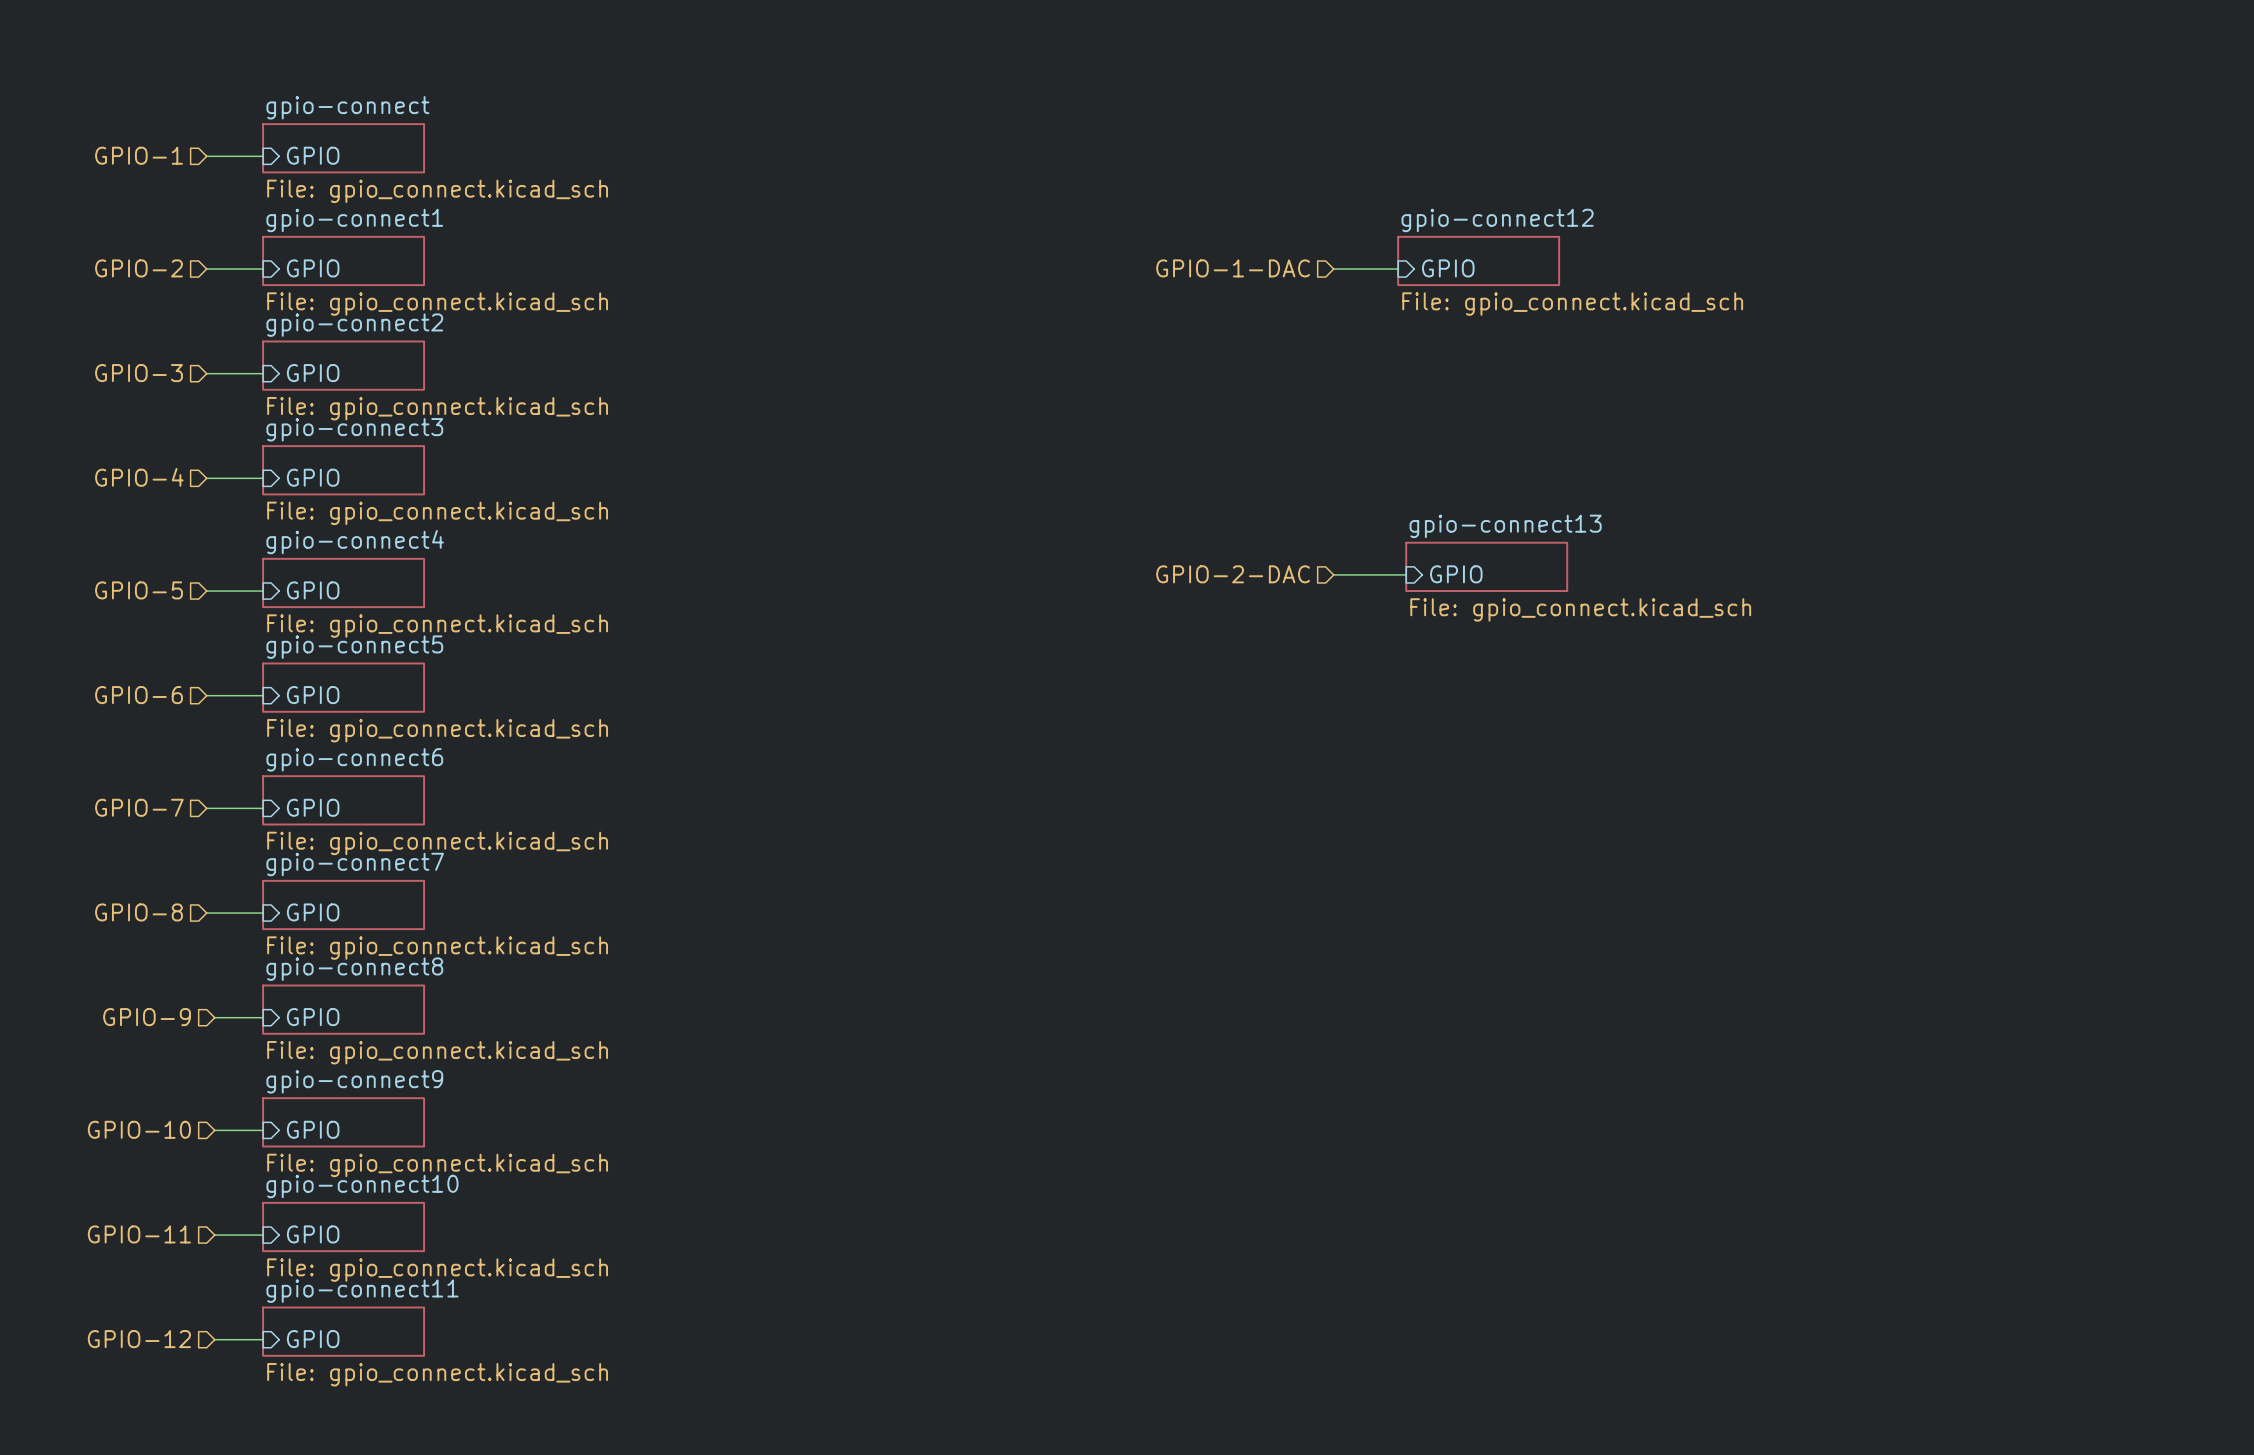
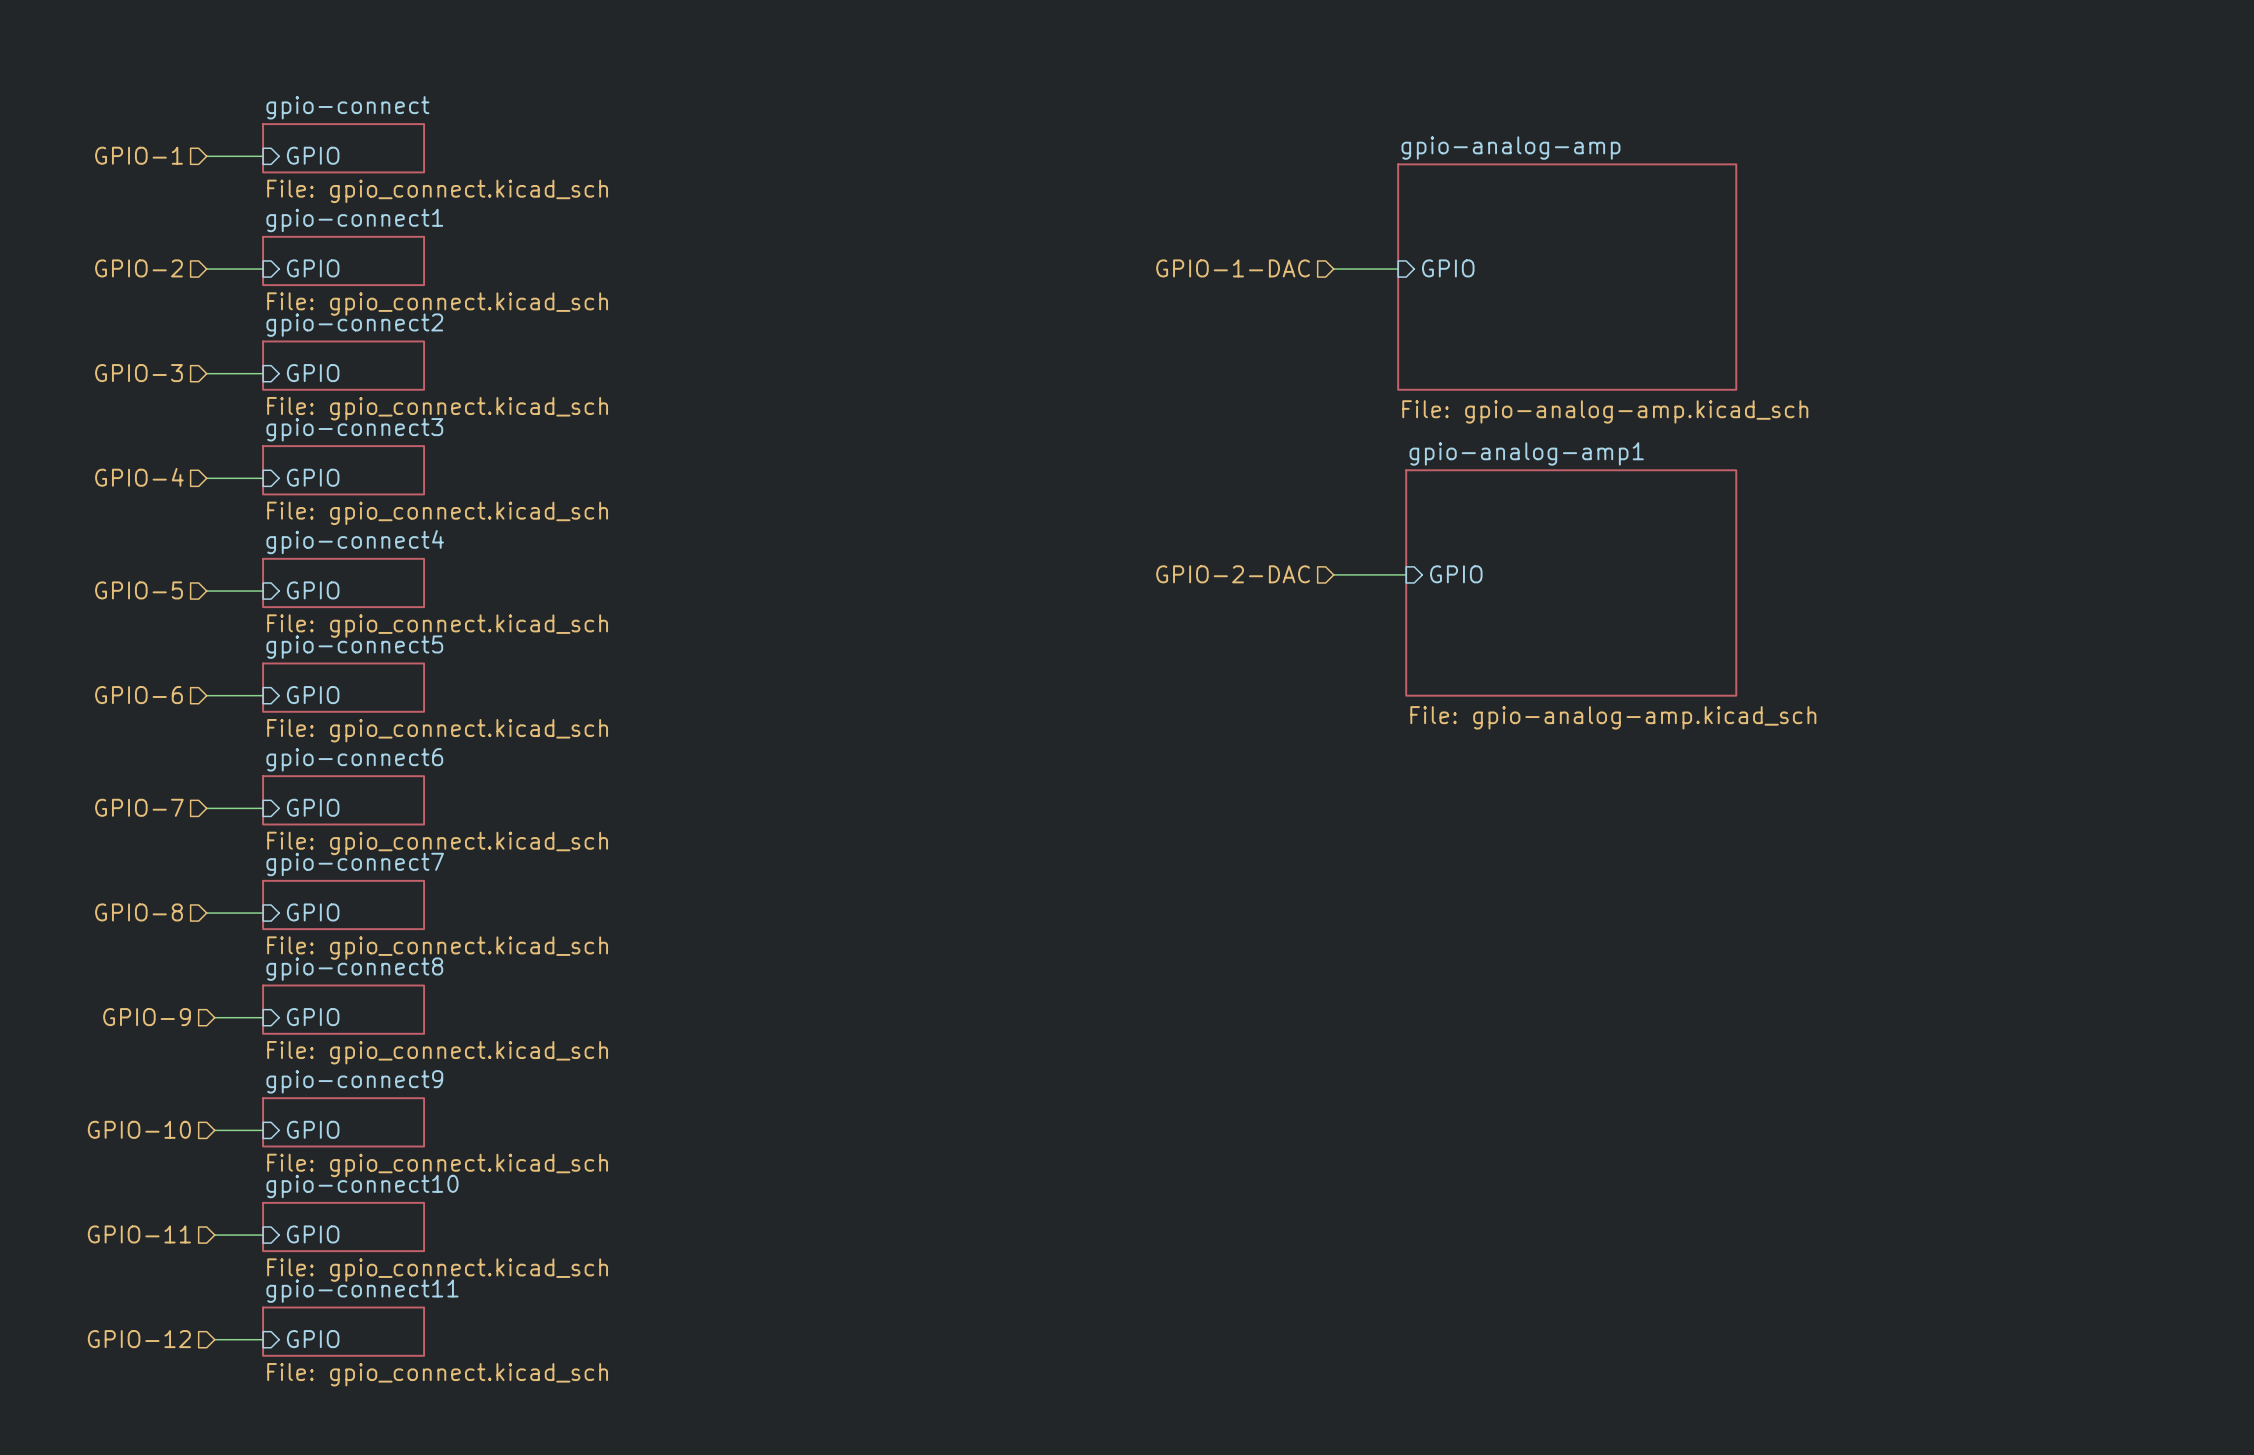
sheet gpio-connect12: File: gpio_connect.kicad_sch (1478, 260) -> none
sheet gpio-analog-amp: none -> File: gpio-analog-amp.kicad_sch (1567, 277)
sheet gpio-connect13: File: gpio_connect.kicad_sch (1486, 566) -> none
sheet gpio-analog-amp1: none -> File: gpio-analog-amp.kicad_sch (1571, 582)

